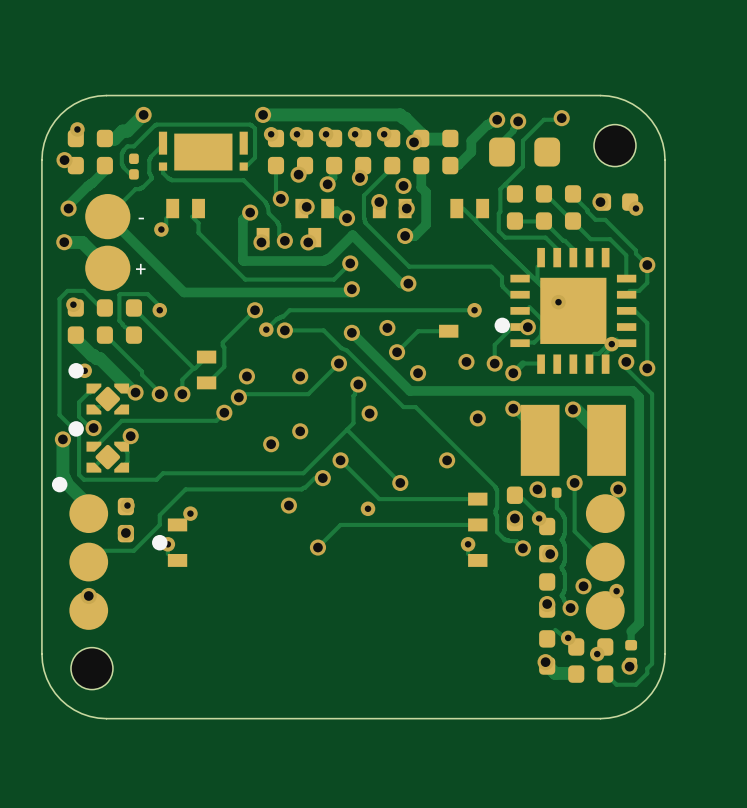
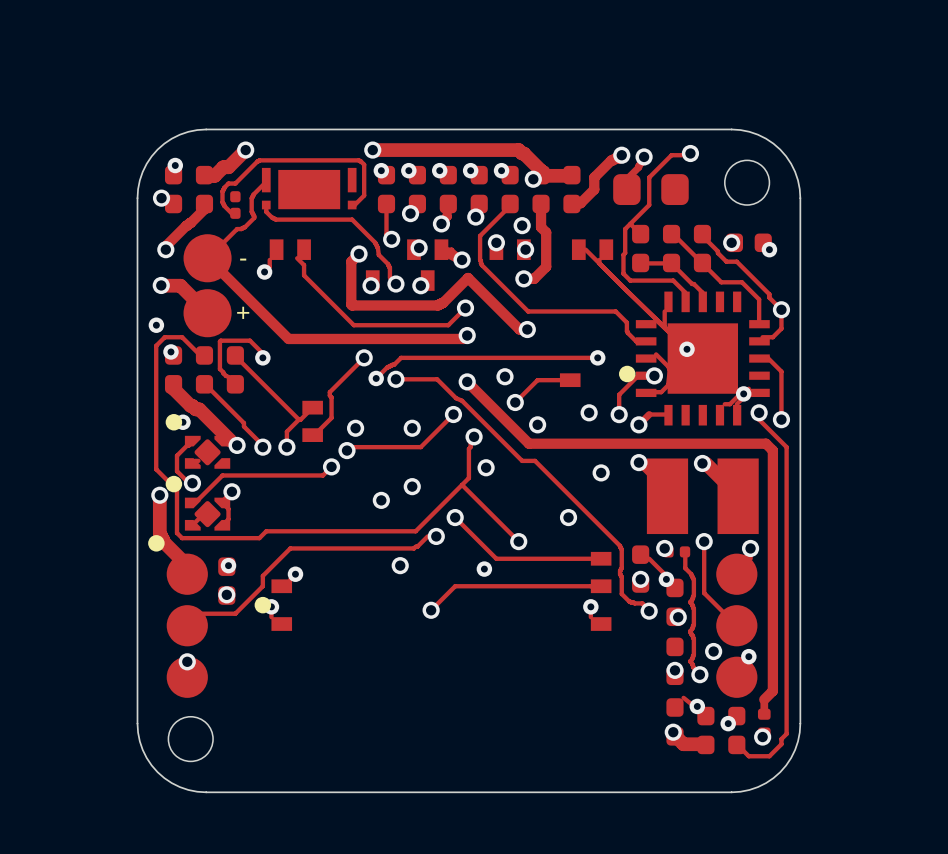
via: none -> (156, 325)

